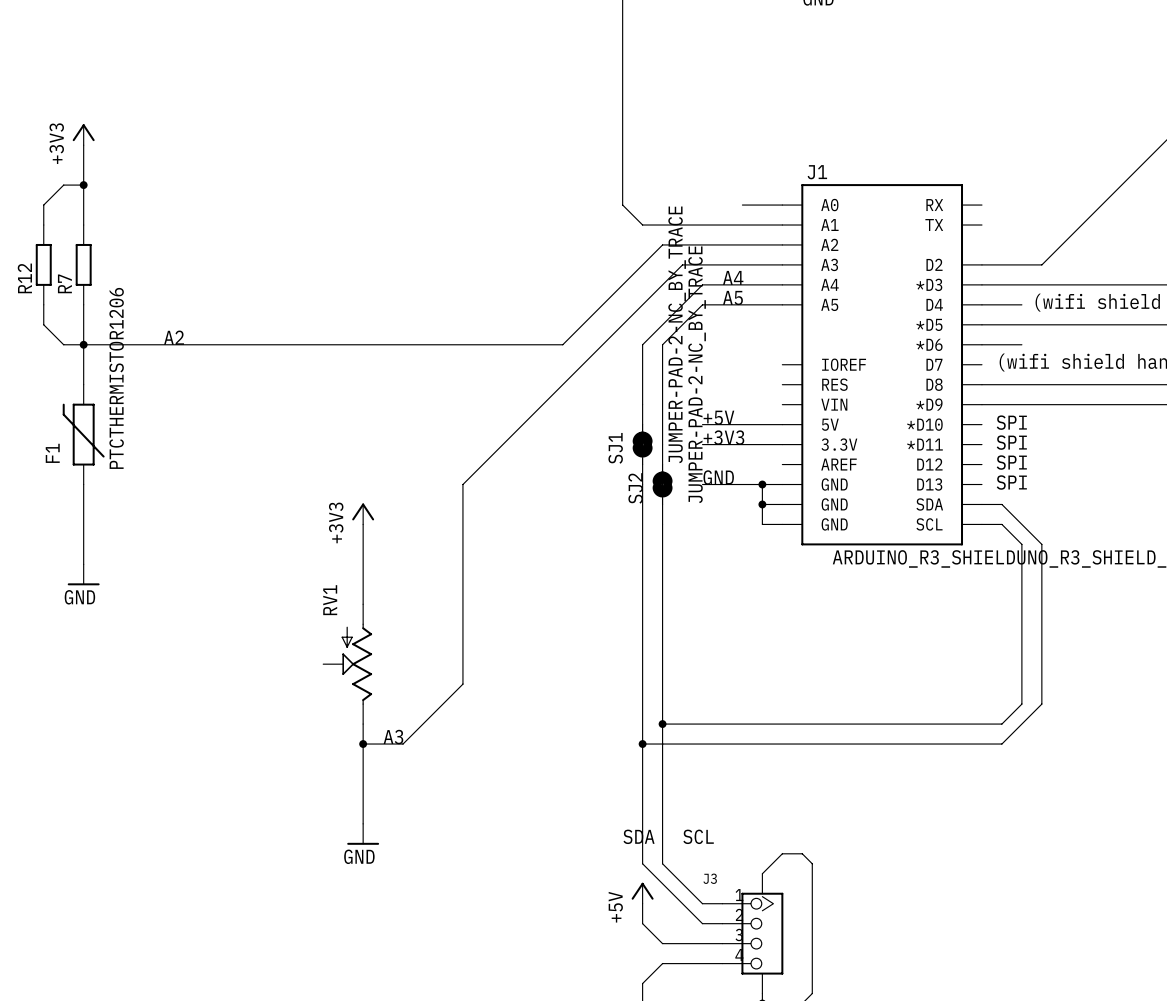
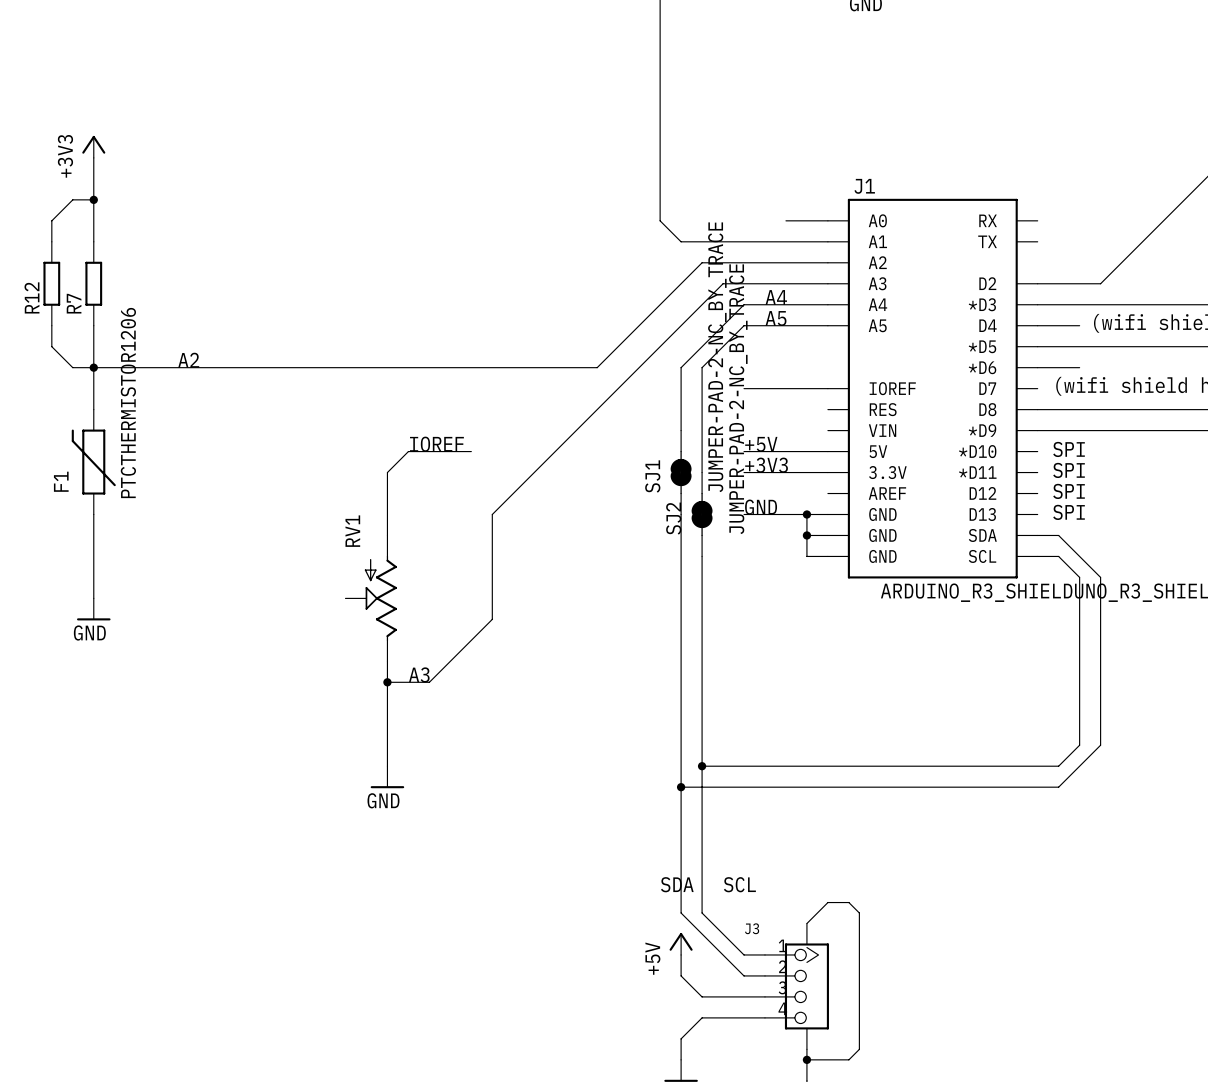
wire: none -> (744, 388) (827, 388)
label: none -> IOREF (436, 444)
wire: none -> (471, 451) (408, 451) (387, 472) (387, 535)
power symbol: +3V3 (363, 513) -> none
wire: (363, 524) (363, 604) -> none
wire: (462, 584) (462, 684) (403, 744) (363, 744) -> (492, 619) (429, 682) (387, 682)
junction: none -> (387, 682)
RV1 position: (347, 664) -> (371, 598)
wire: (363, 724) (363, 823) -> (387, 766) (387, 661)
label position: A3 (393, 737) -> A3 (419, 674)
junction: (363, 744) -> none
power symbol position: GND (363, 834) -> GND (387, 777)

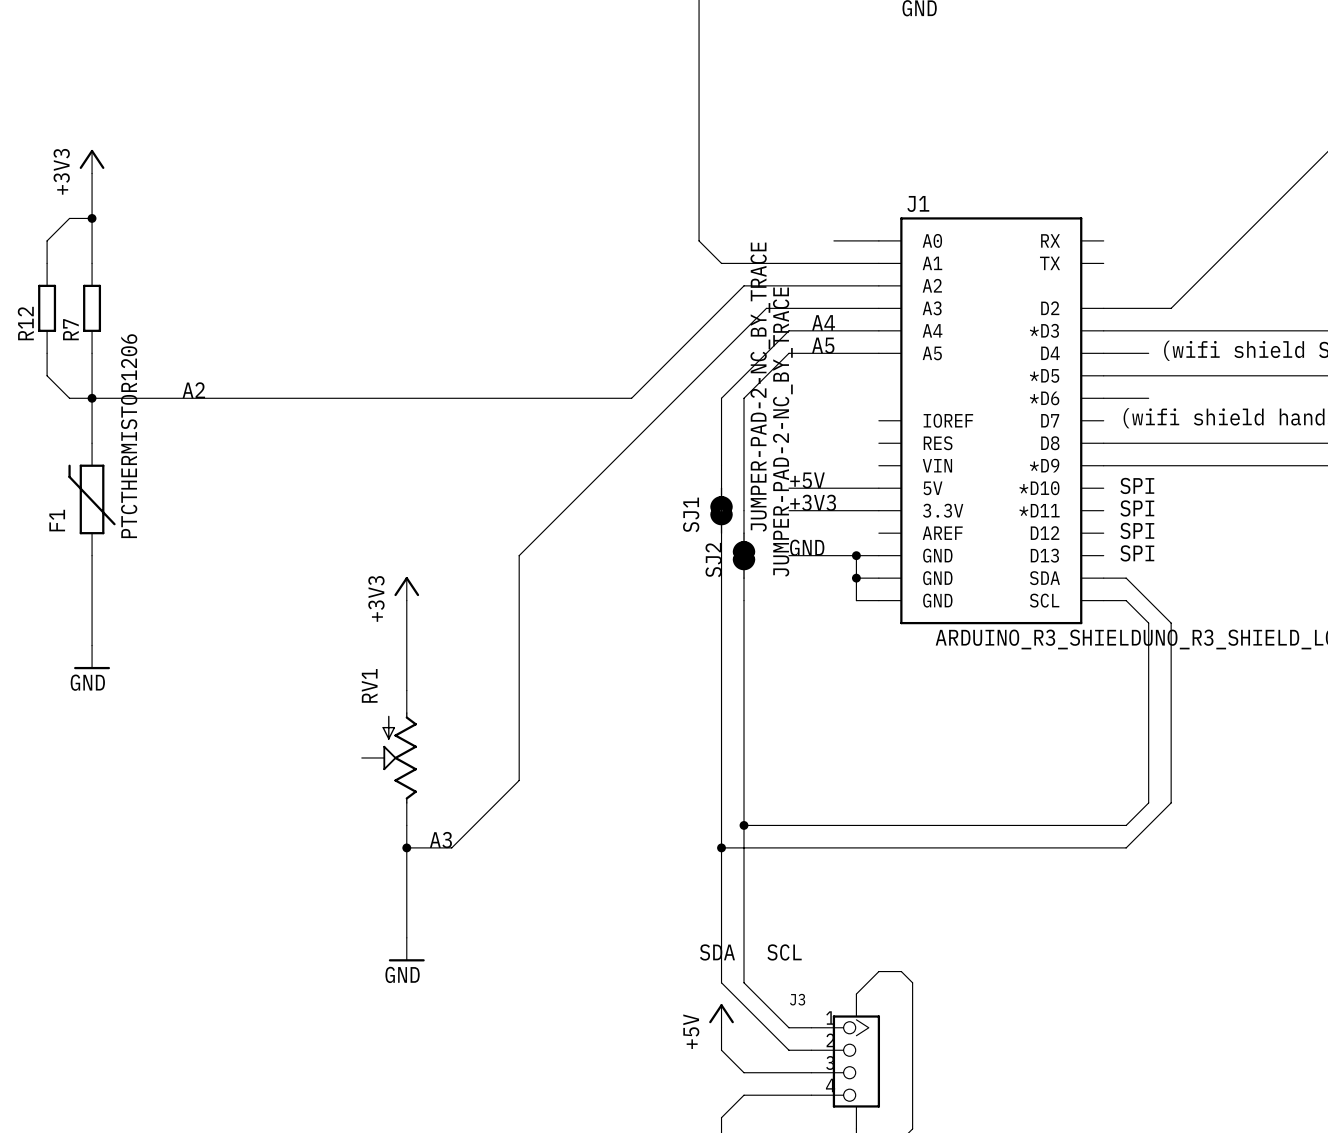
wire: (744, 388) (827, 388) -> none
label: IOREF (436, 444) -> none
wire: (471, 451) (408, 451) (387, 472) (387, 535) -> none
power symbol: none -> +3V3 (406, 588)
wire: none -> (406, 600) (406, 690)
RV1 position: (371, 598) -> (389, 757)
wire: (492, 619) (429, 682) (387, 682) -> (519, 668) (519, 780) (451, 847) (406, 847)
wire: (387, 661) (387, 766) -> (406, 937) (406, 825)
label position: A3 (419, 674) -> A3 (440, 840)
junction: (387, 682) -> none
power symbol position: GND (387, 777) -> GND (406, 949)
junction: none -> (406, 847)

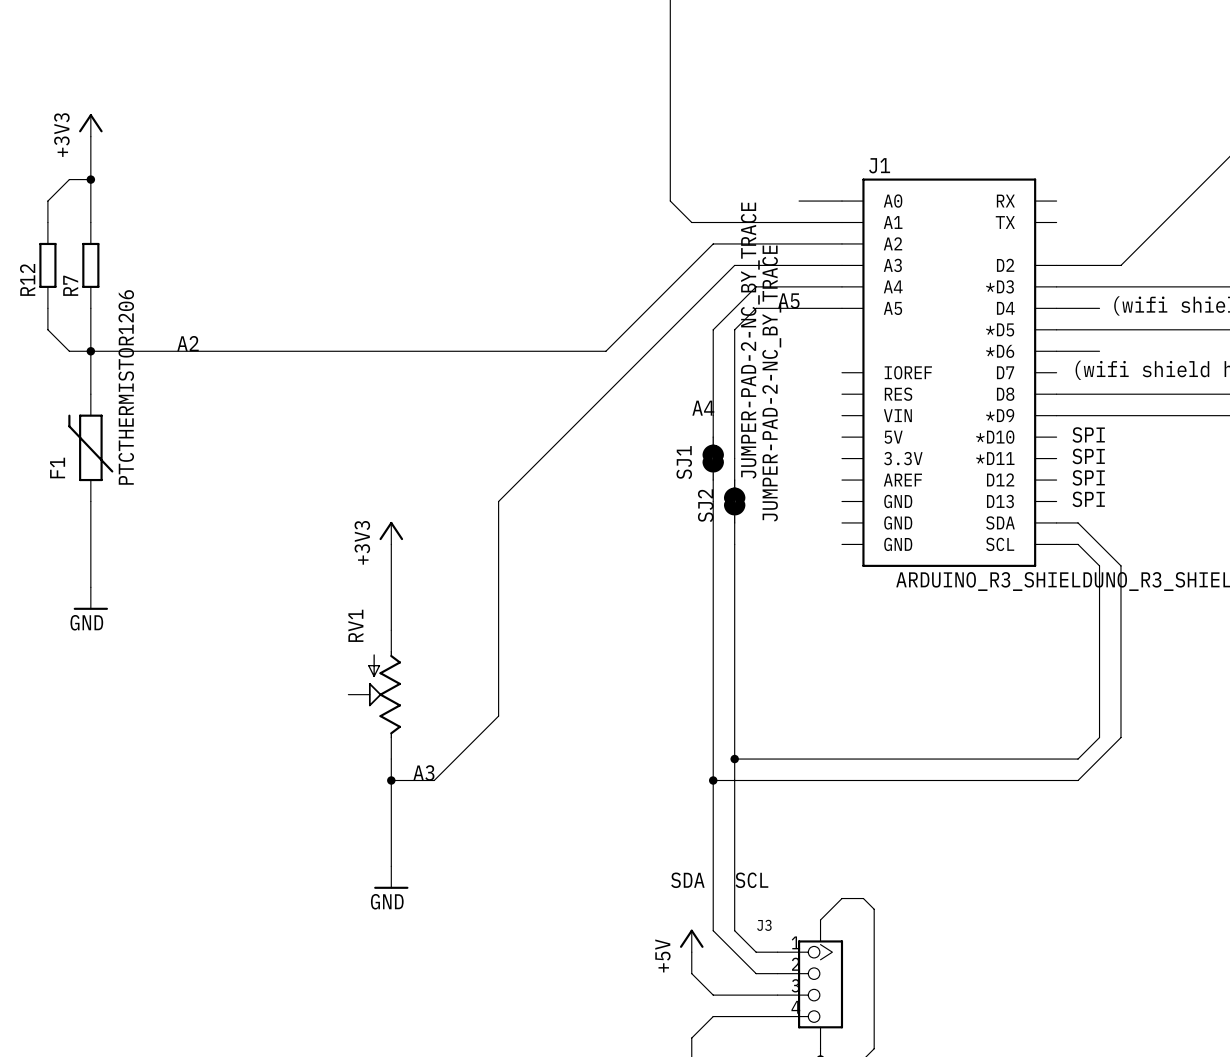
label position: A4 (823, 322) -> A4 (703, 408)
wire: (744, 375) (721, 398) (721, 465) -> none
wire: (766, 375) (744, 398) -> (713, 329) (713, 351)
wire: none -> (734, 329) (734, 458)
label: +5V (807, 480) -> none
wire: (788, 488) (878, 488) -> none
label: +3V3 (813, 502) -> none
SJ1 position: (721, 510) -> (713, 458)
wire: (788, 510) (878, 510) -> none
label: GND (807, 547) -> none
wire: (721, 555) (721, 982) (744, 1005) -> none
SJ2 position: (744, 555) -> (734, 501)
wire: (788, 555) (878, 555) -> none
wire: (856, 555) (856, 600) (878, 600) -> none
junction: (856, 555) -> none
wire: (856, 578) (878, 578) -> none
junction: (856, 578) -> none
wire: none -> (734, 544) (734, 930)
wire: (744, 825) (766, 825) -> none
junction: (744, 825) -> none
junction: none -> (734, 759)
wire: (721, 847) (744, 847) -> none
junction: (721, 847) -> none
junction: none -> (713, 780)
wire: (744, 982) (766, 1005) -> (713, 909) (713, 930)

